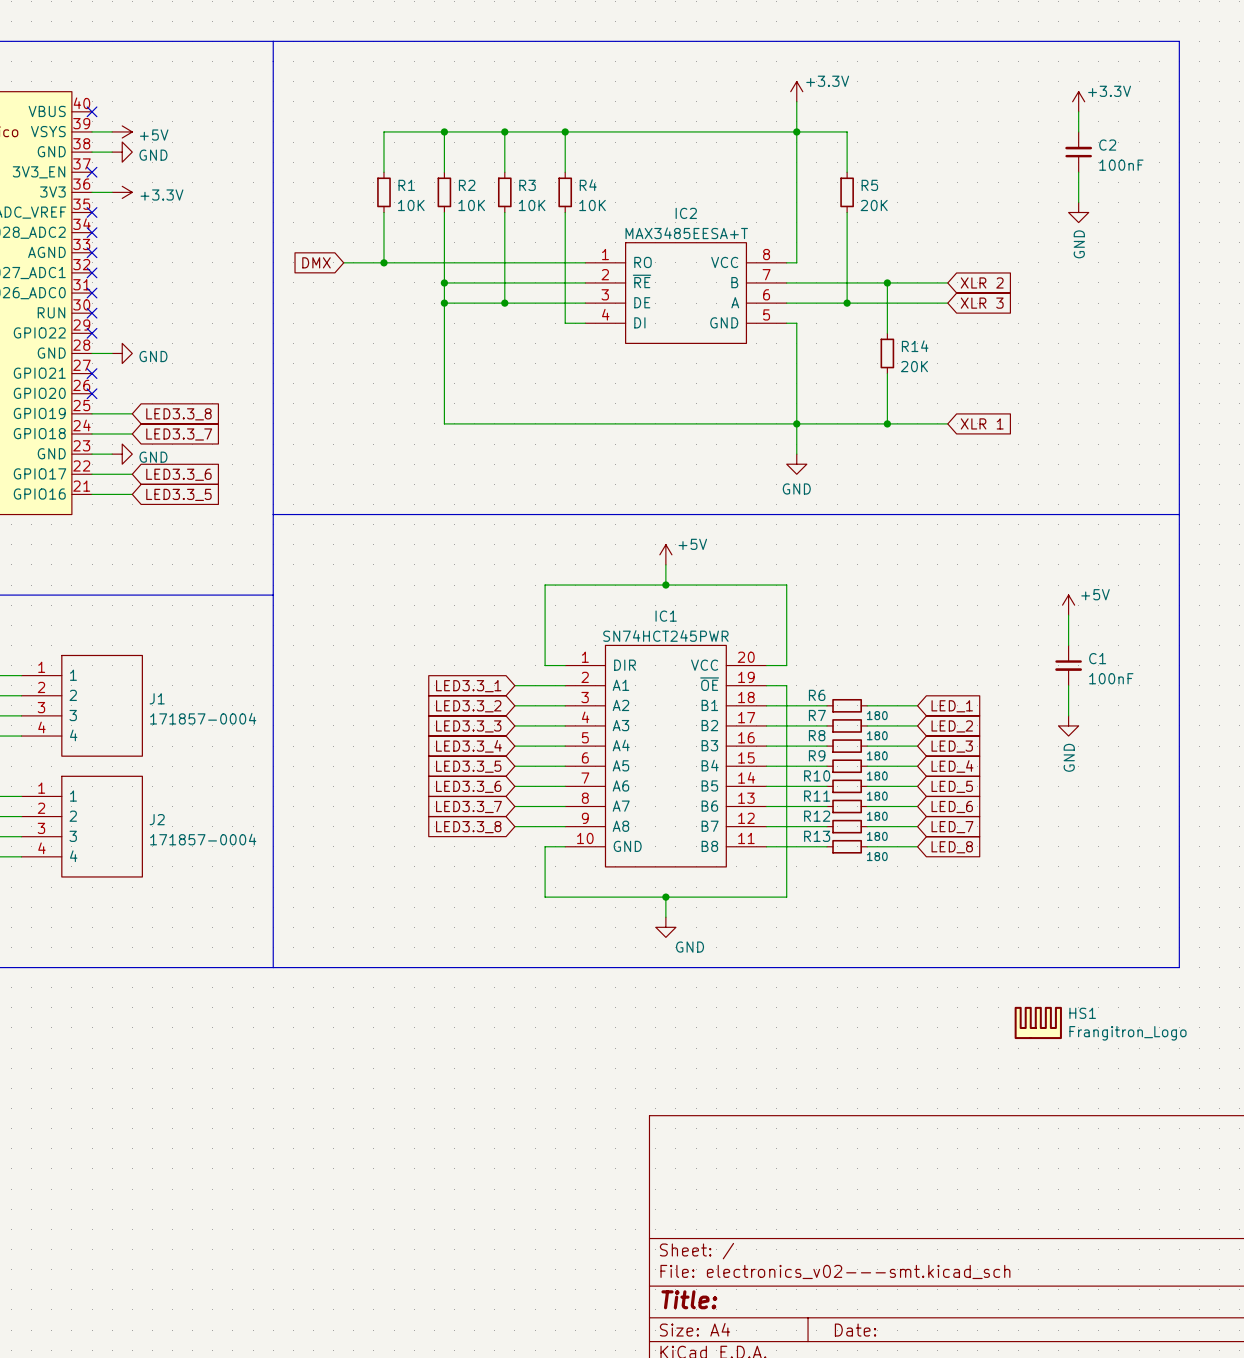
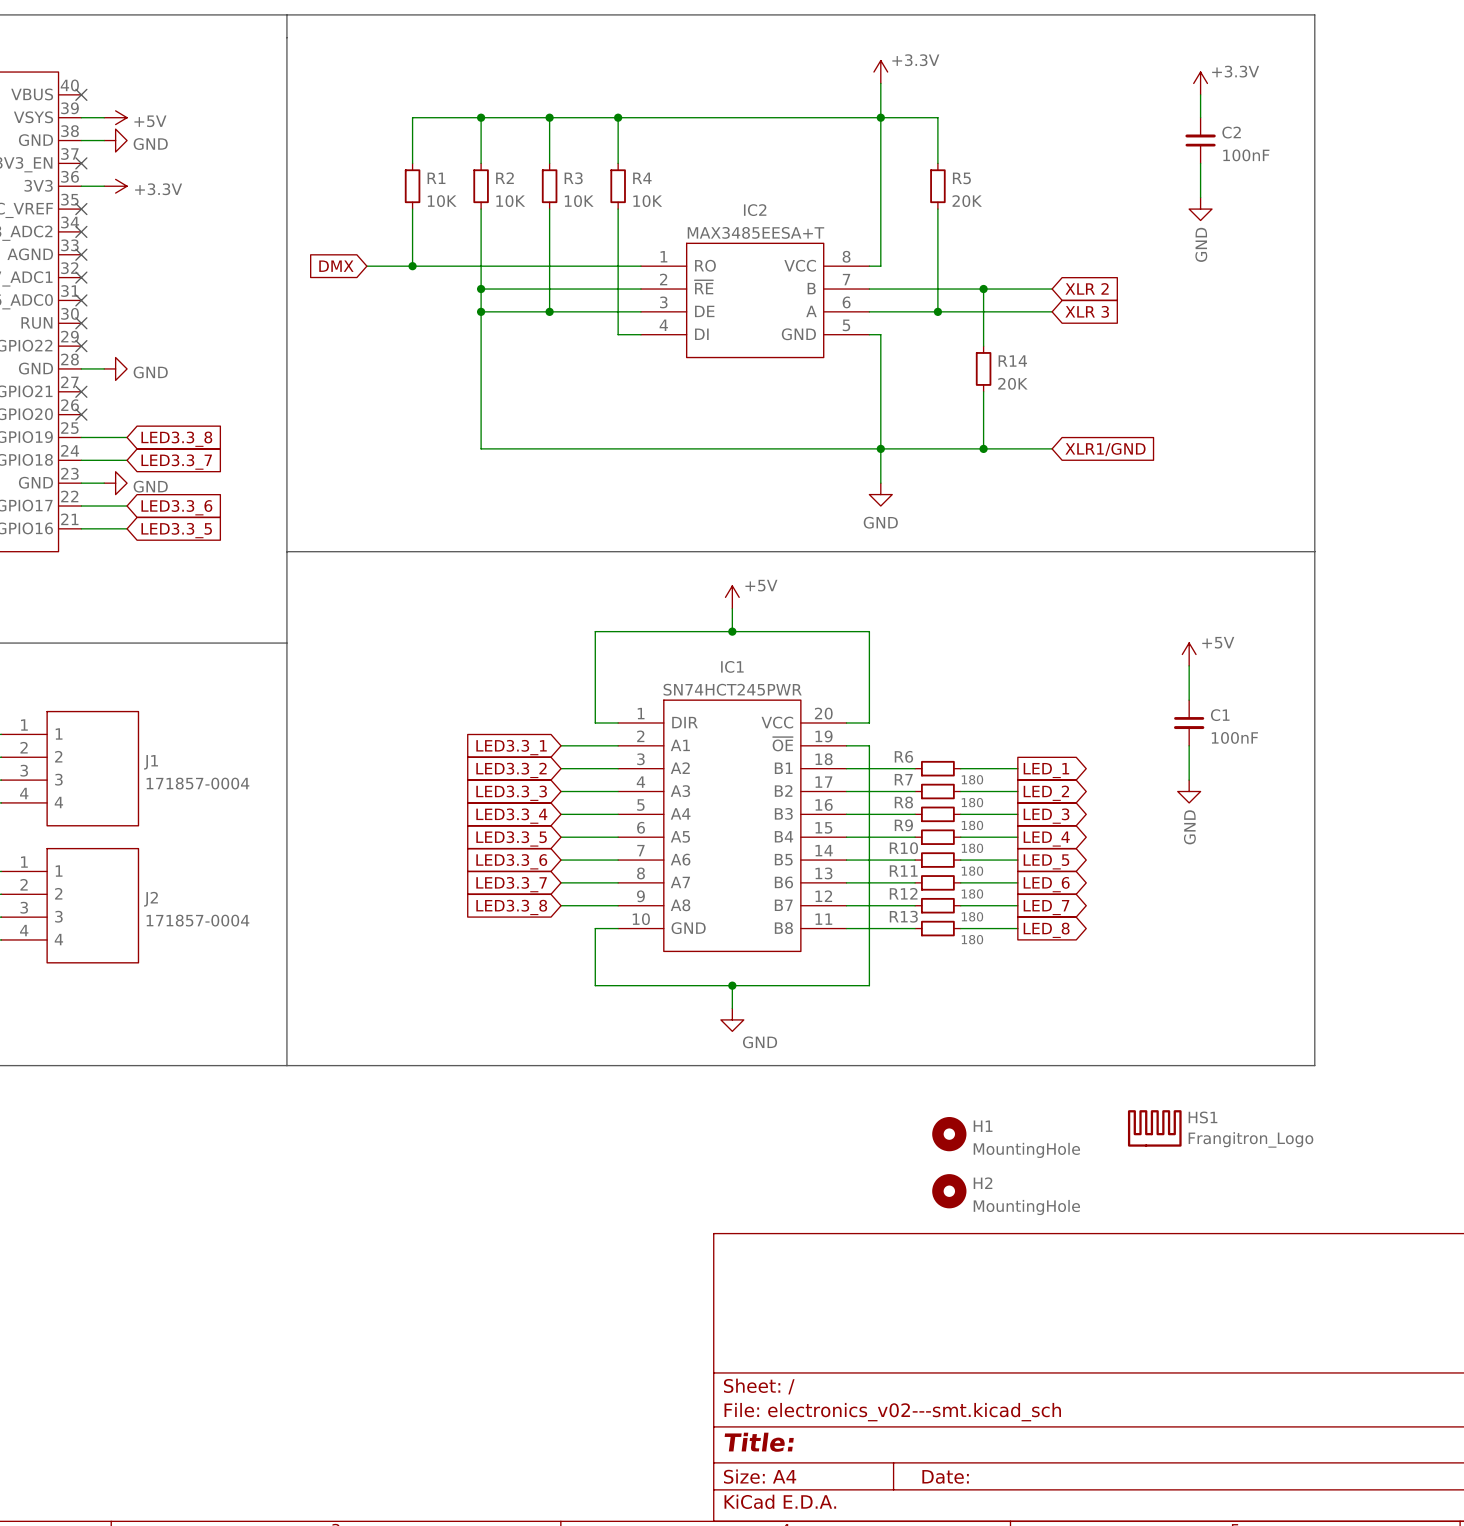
global label: XLR 1 (982, 423) -> XLR1/GND (1105, 449)
global label shape: input (952, 706) -> output (1046, 770)
global label shape: input (952, 726) -> output (1046, 793)
global label shape: input (952, 746) -> output (1046, 816)
global label shape: input (952, 766) -> output (1046, 839)
global label shape: input (952, 786) -> output (1046, 861)
global label shape: input (952, 806) -> output (1046, 884)
global label shape: input (952, 827) -> output (1046, 907)
global label shape: input (952, 847) -> output (1046, 930)
H1: none -> MountingHole (949, 1134)
H2: none -> MountingHole (949, 1191)

